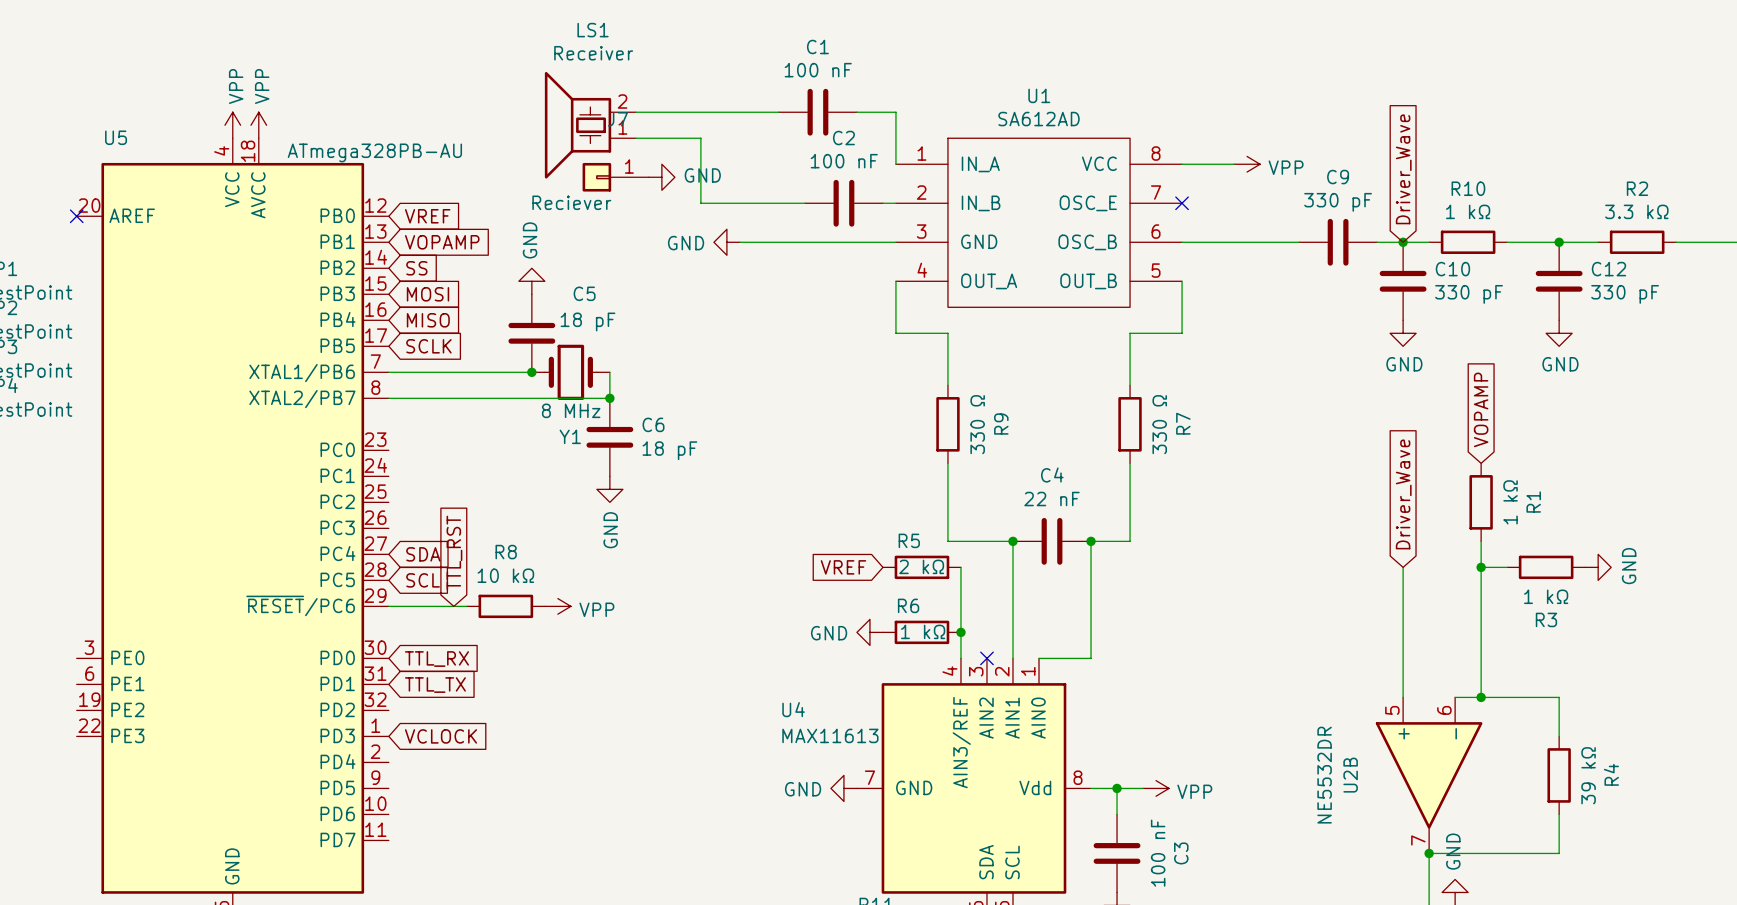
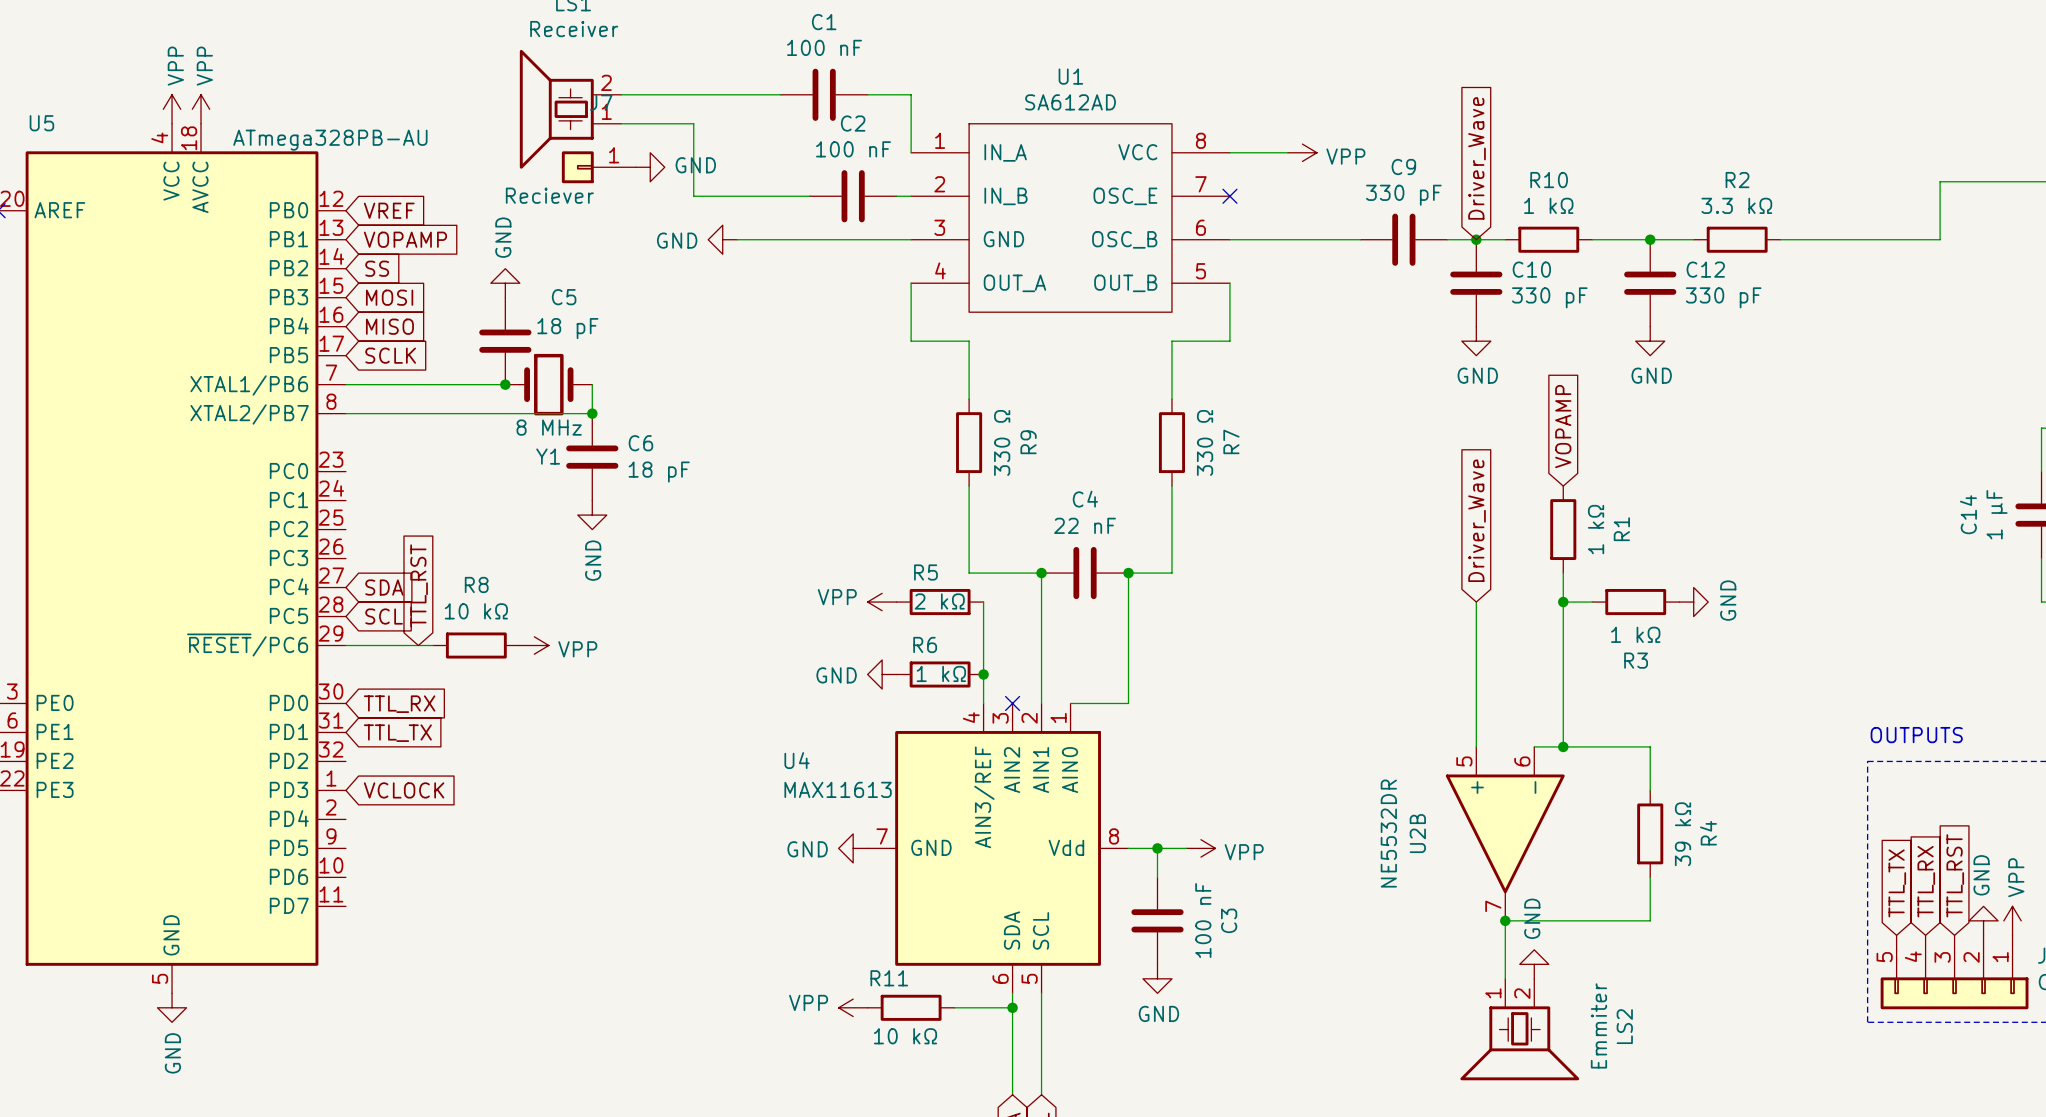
global label: VREF (843, 567) -> none
power symbol: none -> VPP (882, 602)

